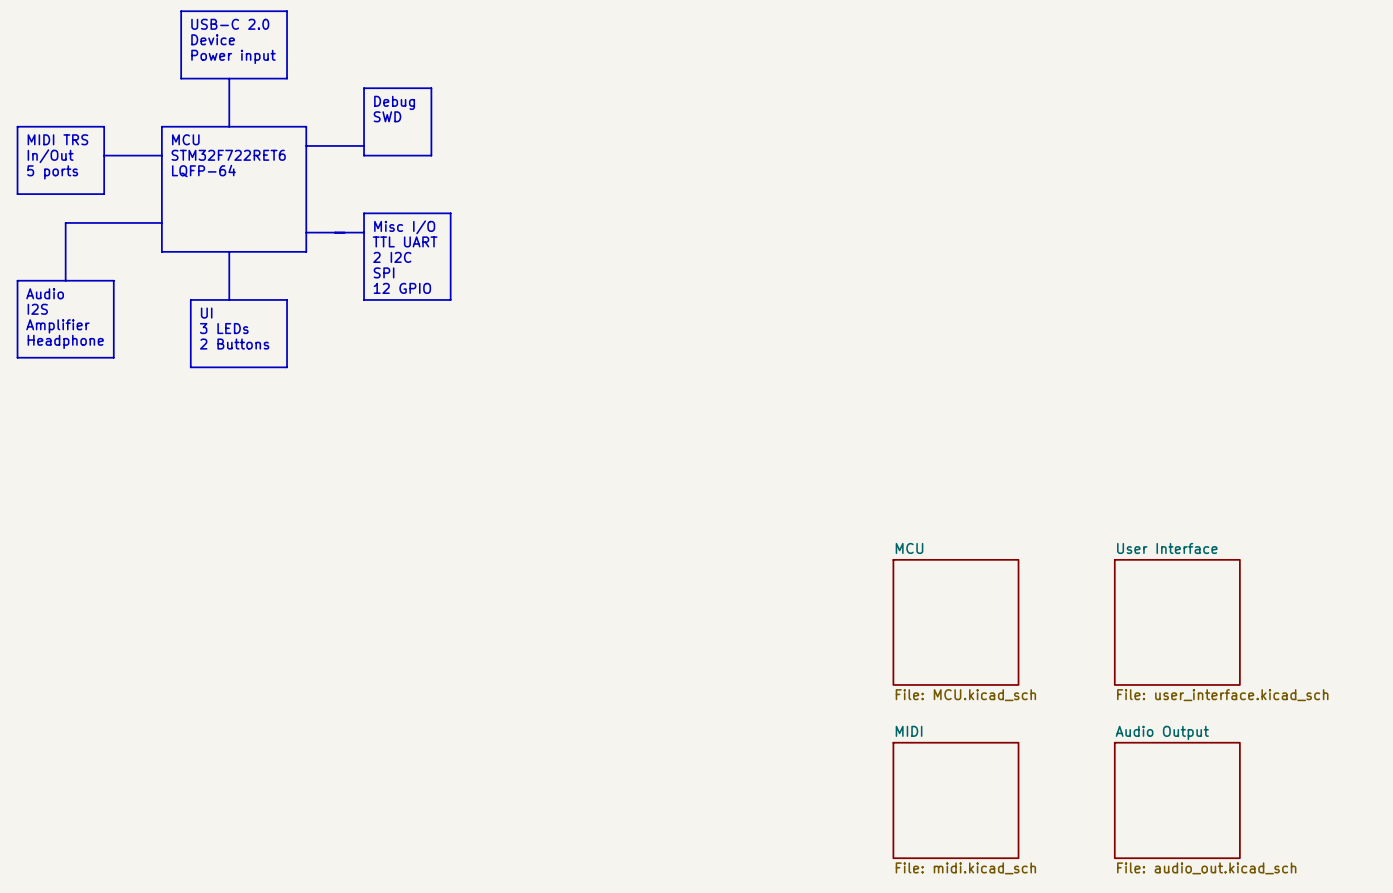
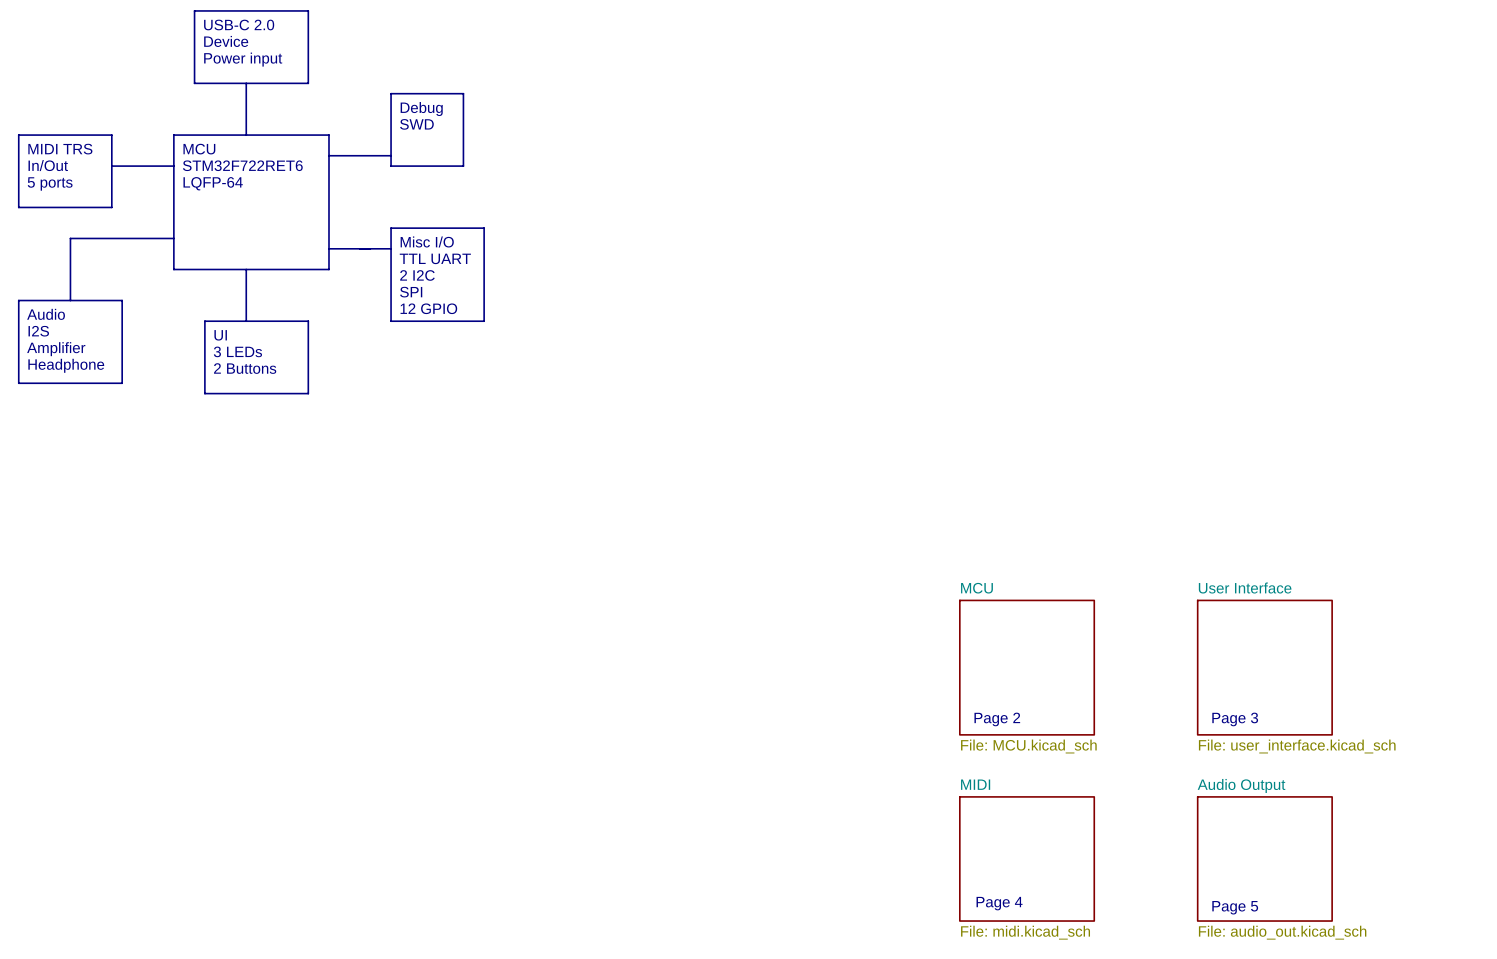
text: none -> Page 2 (997, 719)
text: none -> Page 3 (1235, 719)
text: none -> Page 4 (999, 903)
text: none -> Page 5 (1235, 907)

